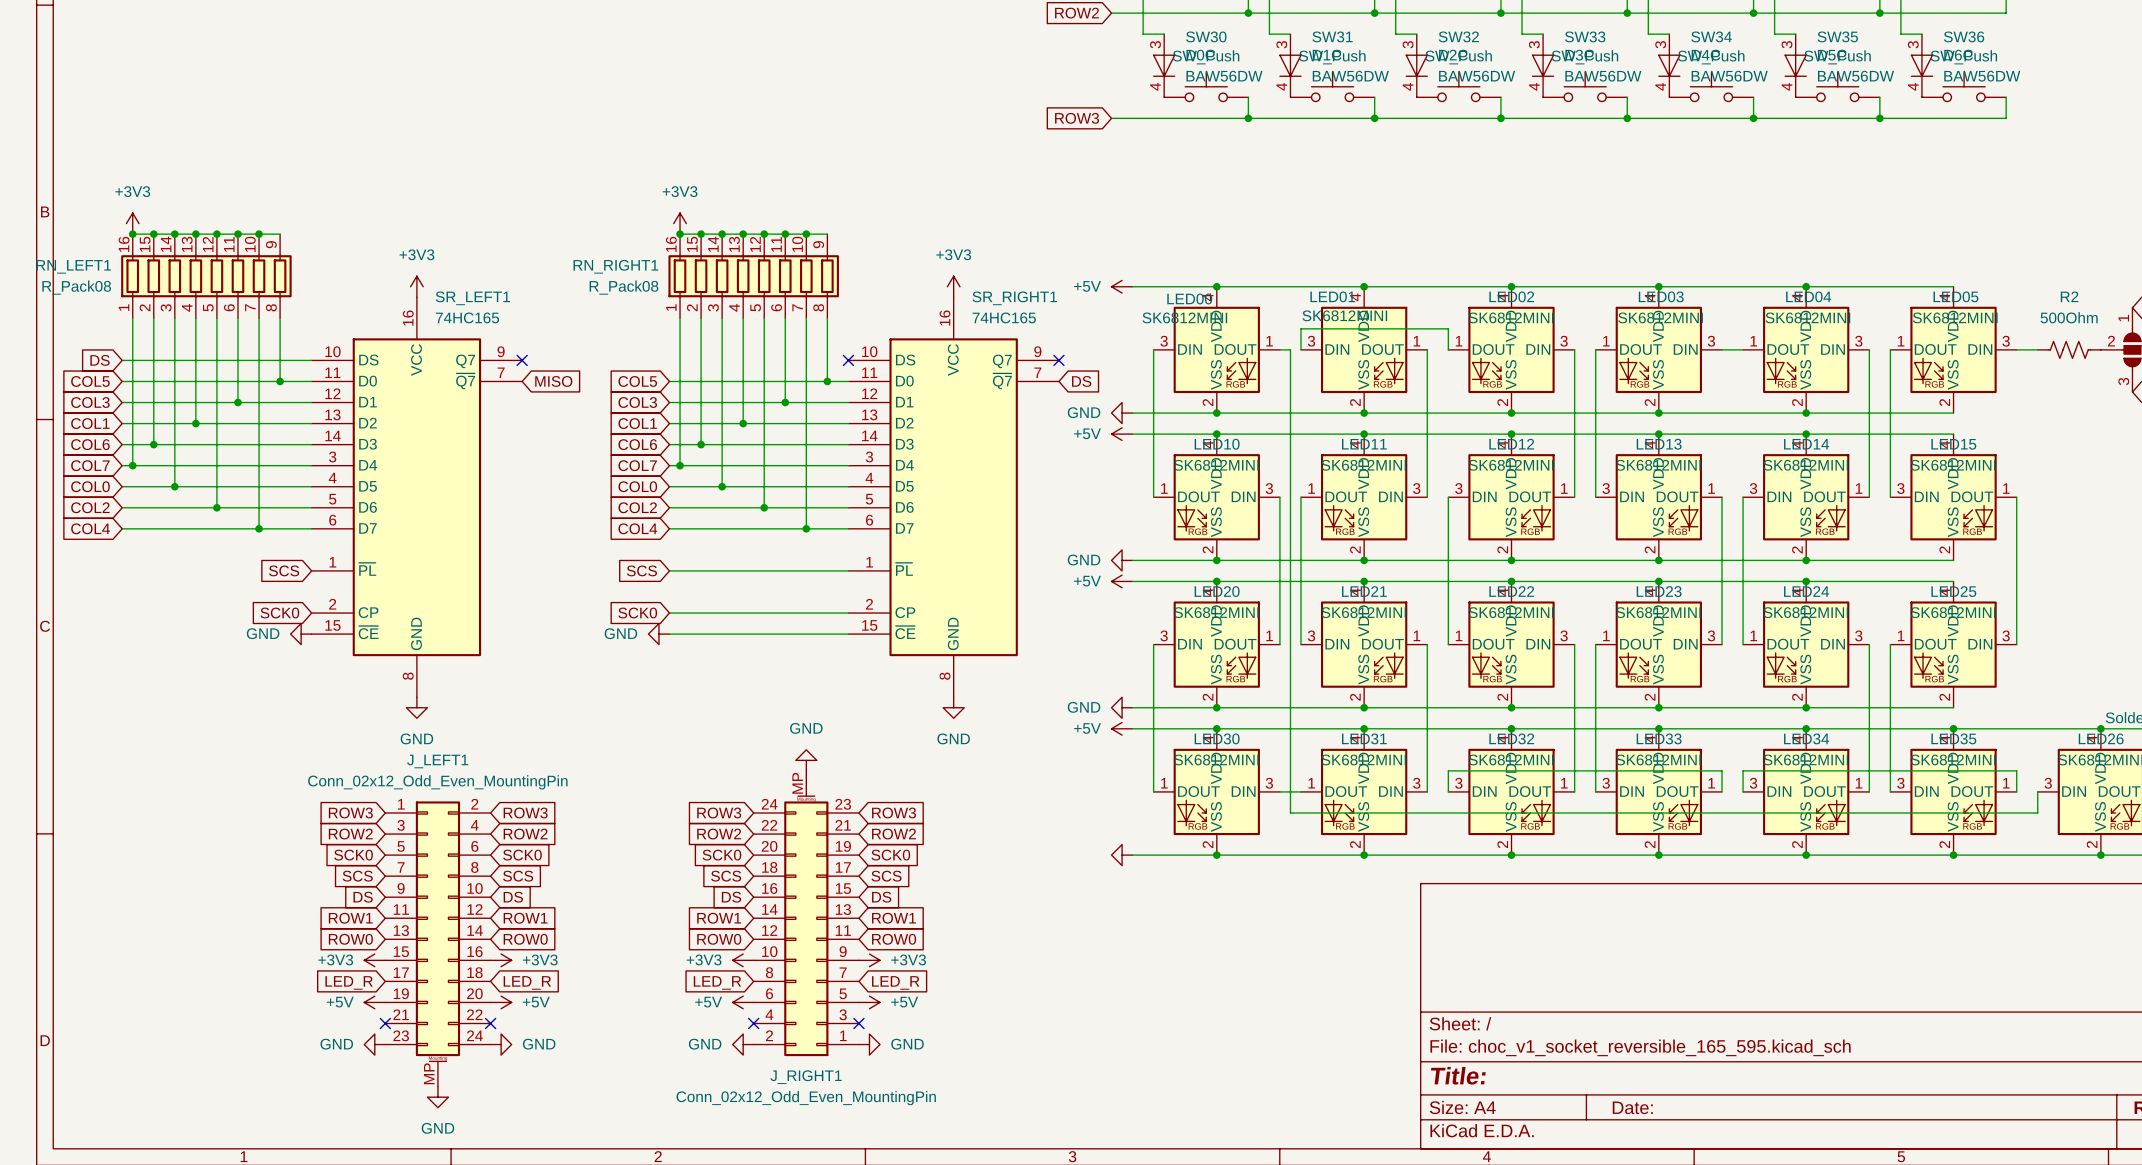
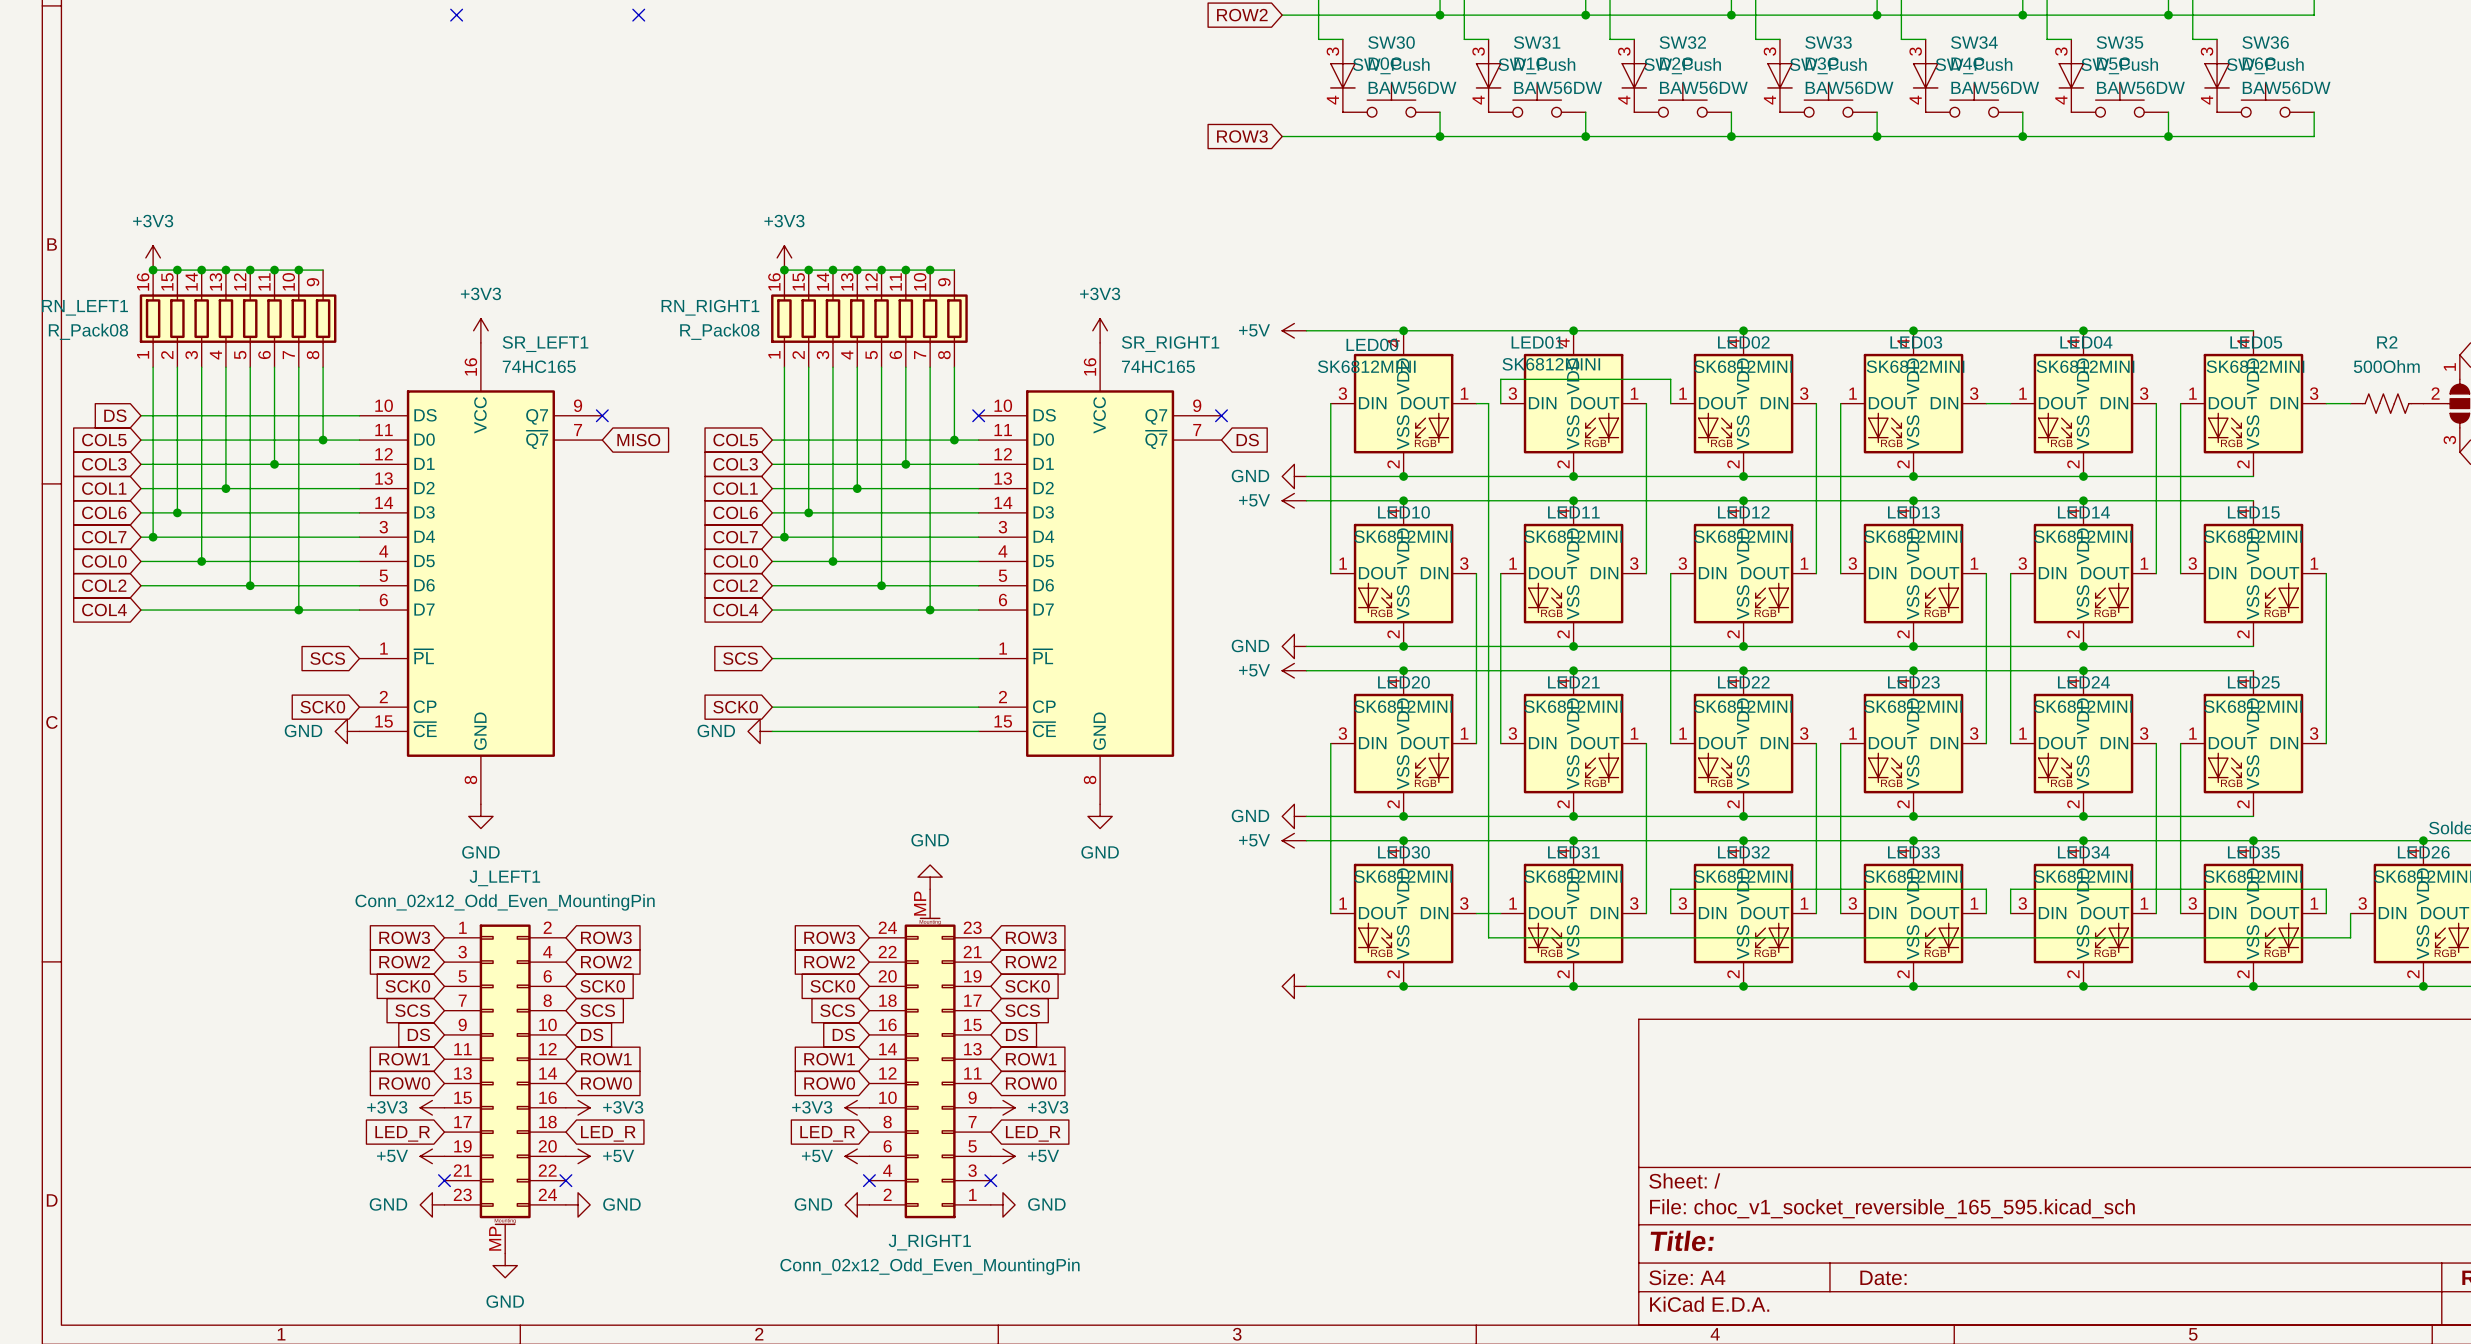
no-connect mark: none -> (456, 15)
no-connect mark: none -> (638, 15)

